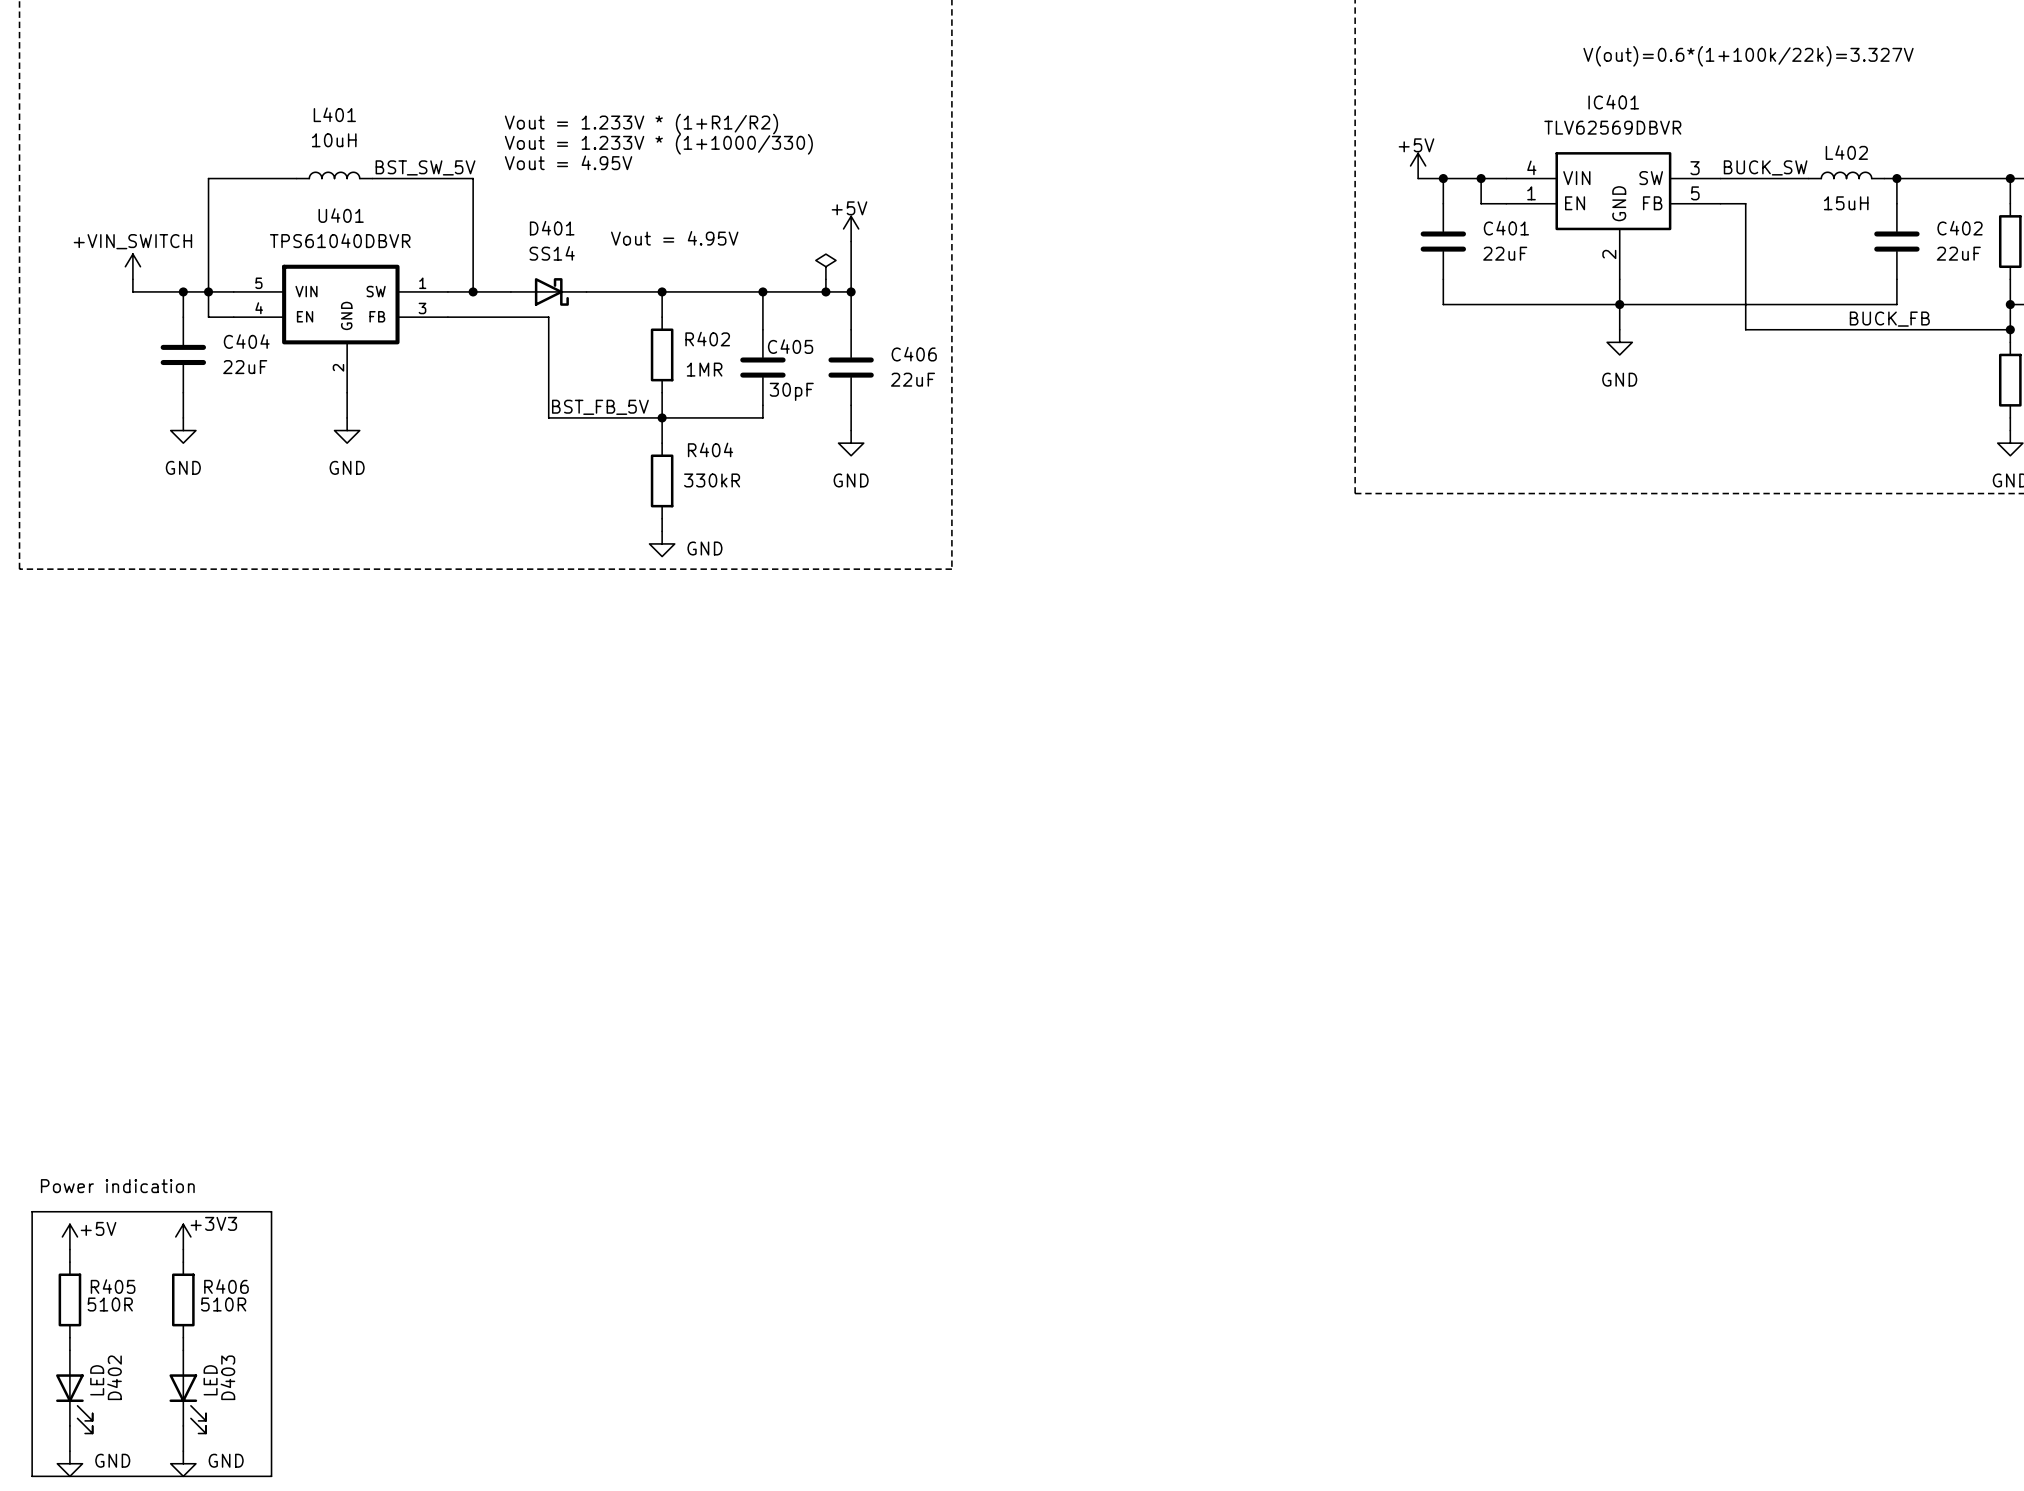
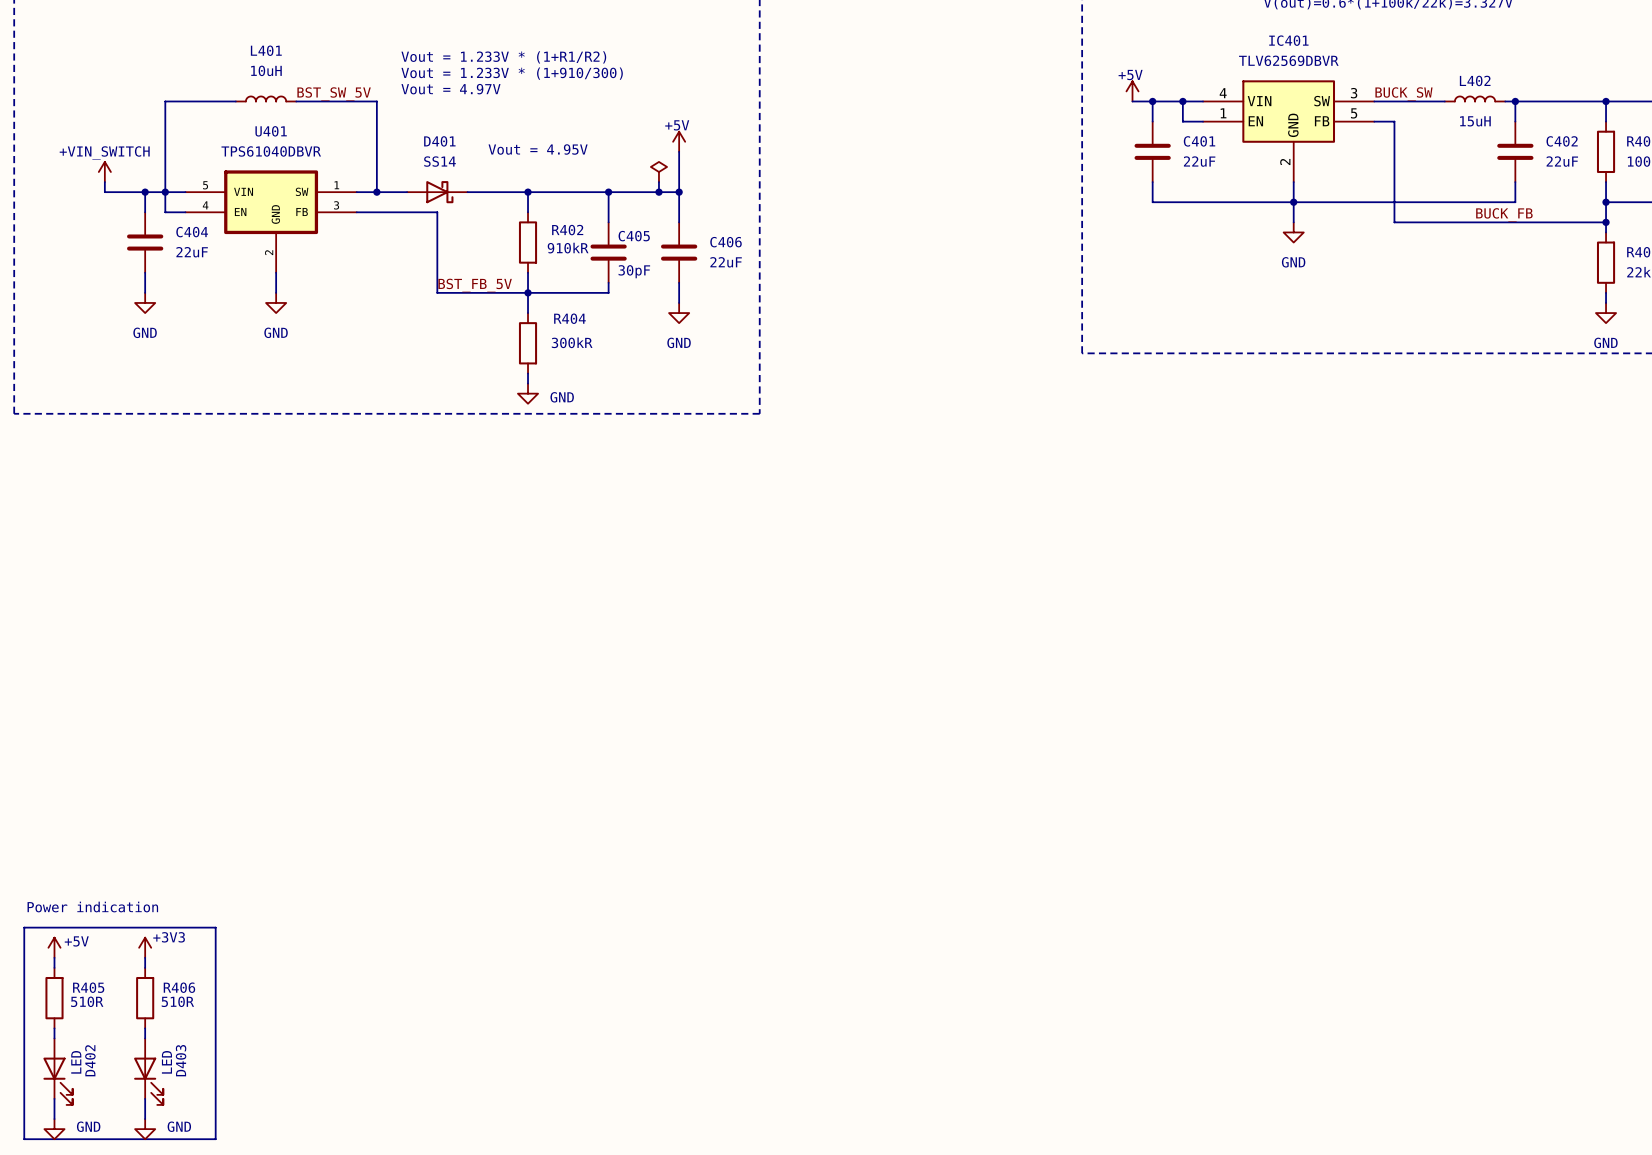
text: Vout = 1.233V * (1+1000/330) (658, 144) -> Vout = 1.233V * (1+910/300) (512, 73)
text: Vout = 4.95V (568, 162) -> Vout = 4.97V (450, 89)
R402 value: 1MR (704, 369) -> 910kR (568, 248)
R404 value: 330kR (712, 480) -> 300kR (572, 342)

